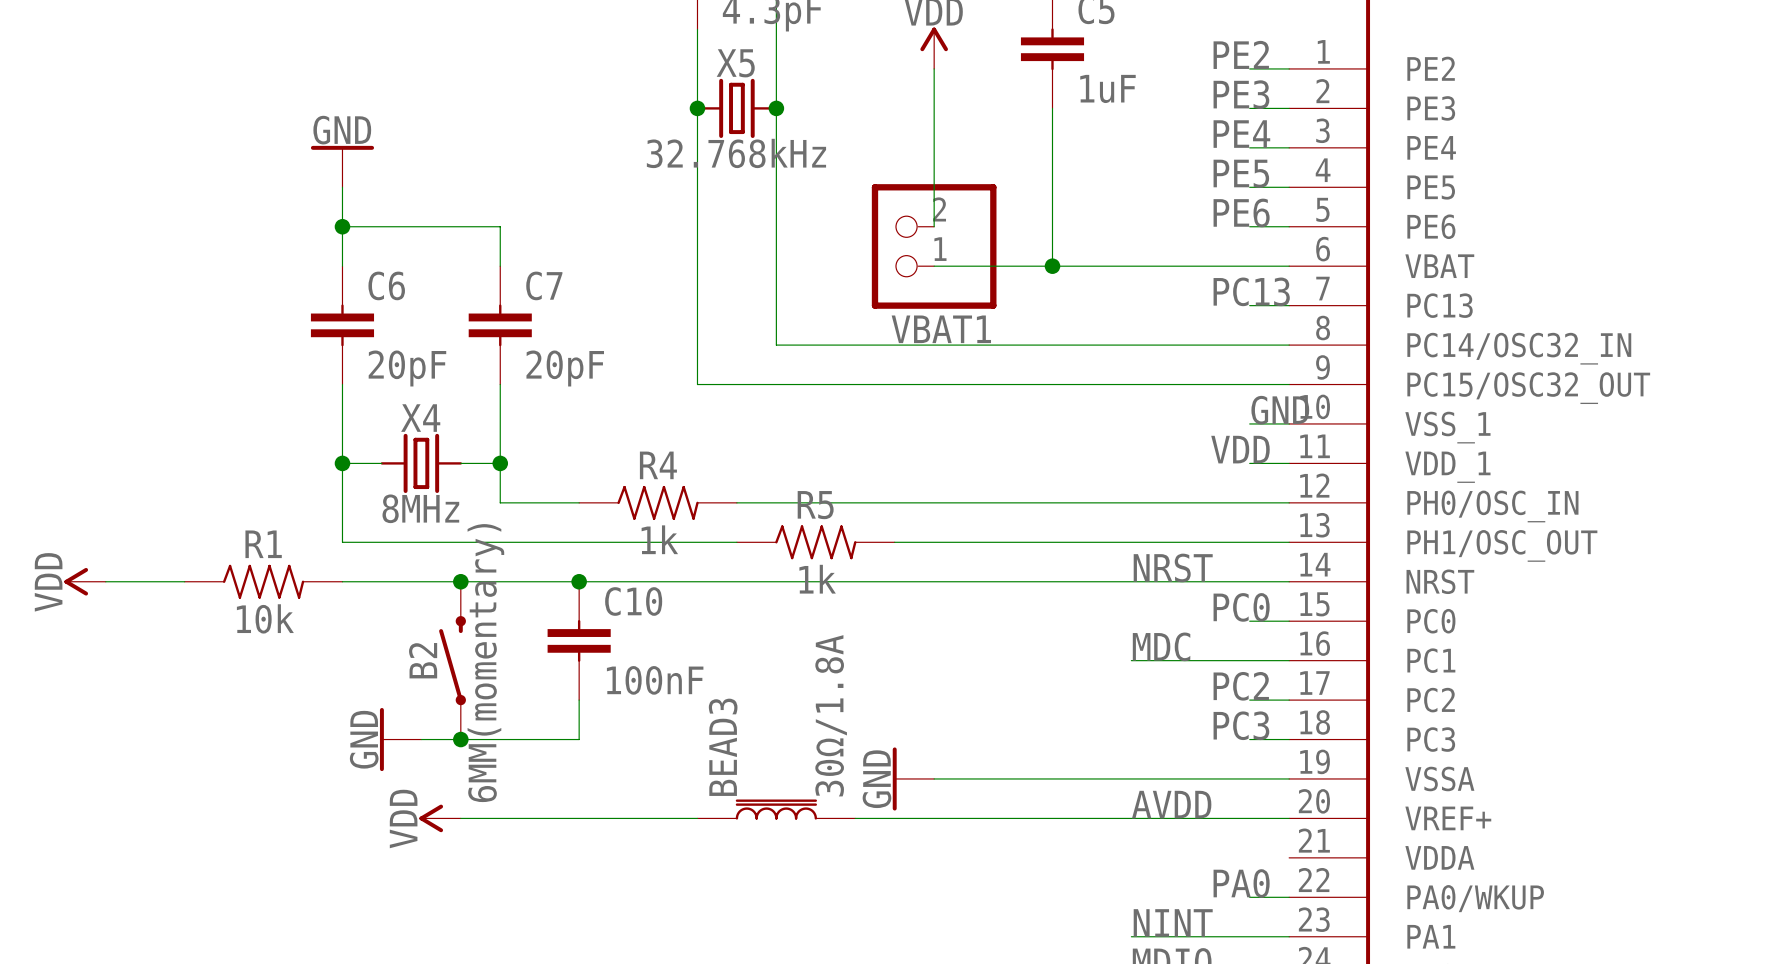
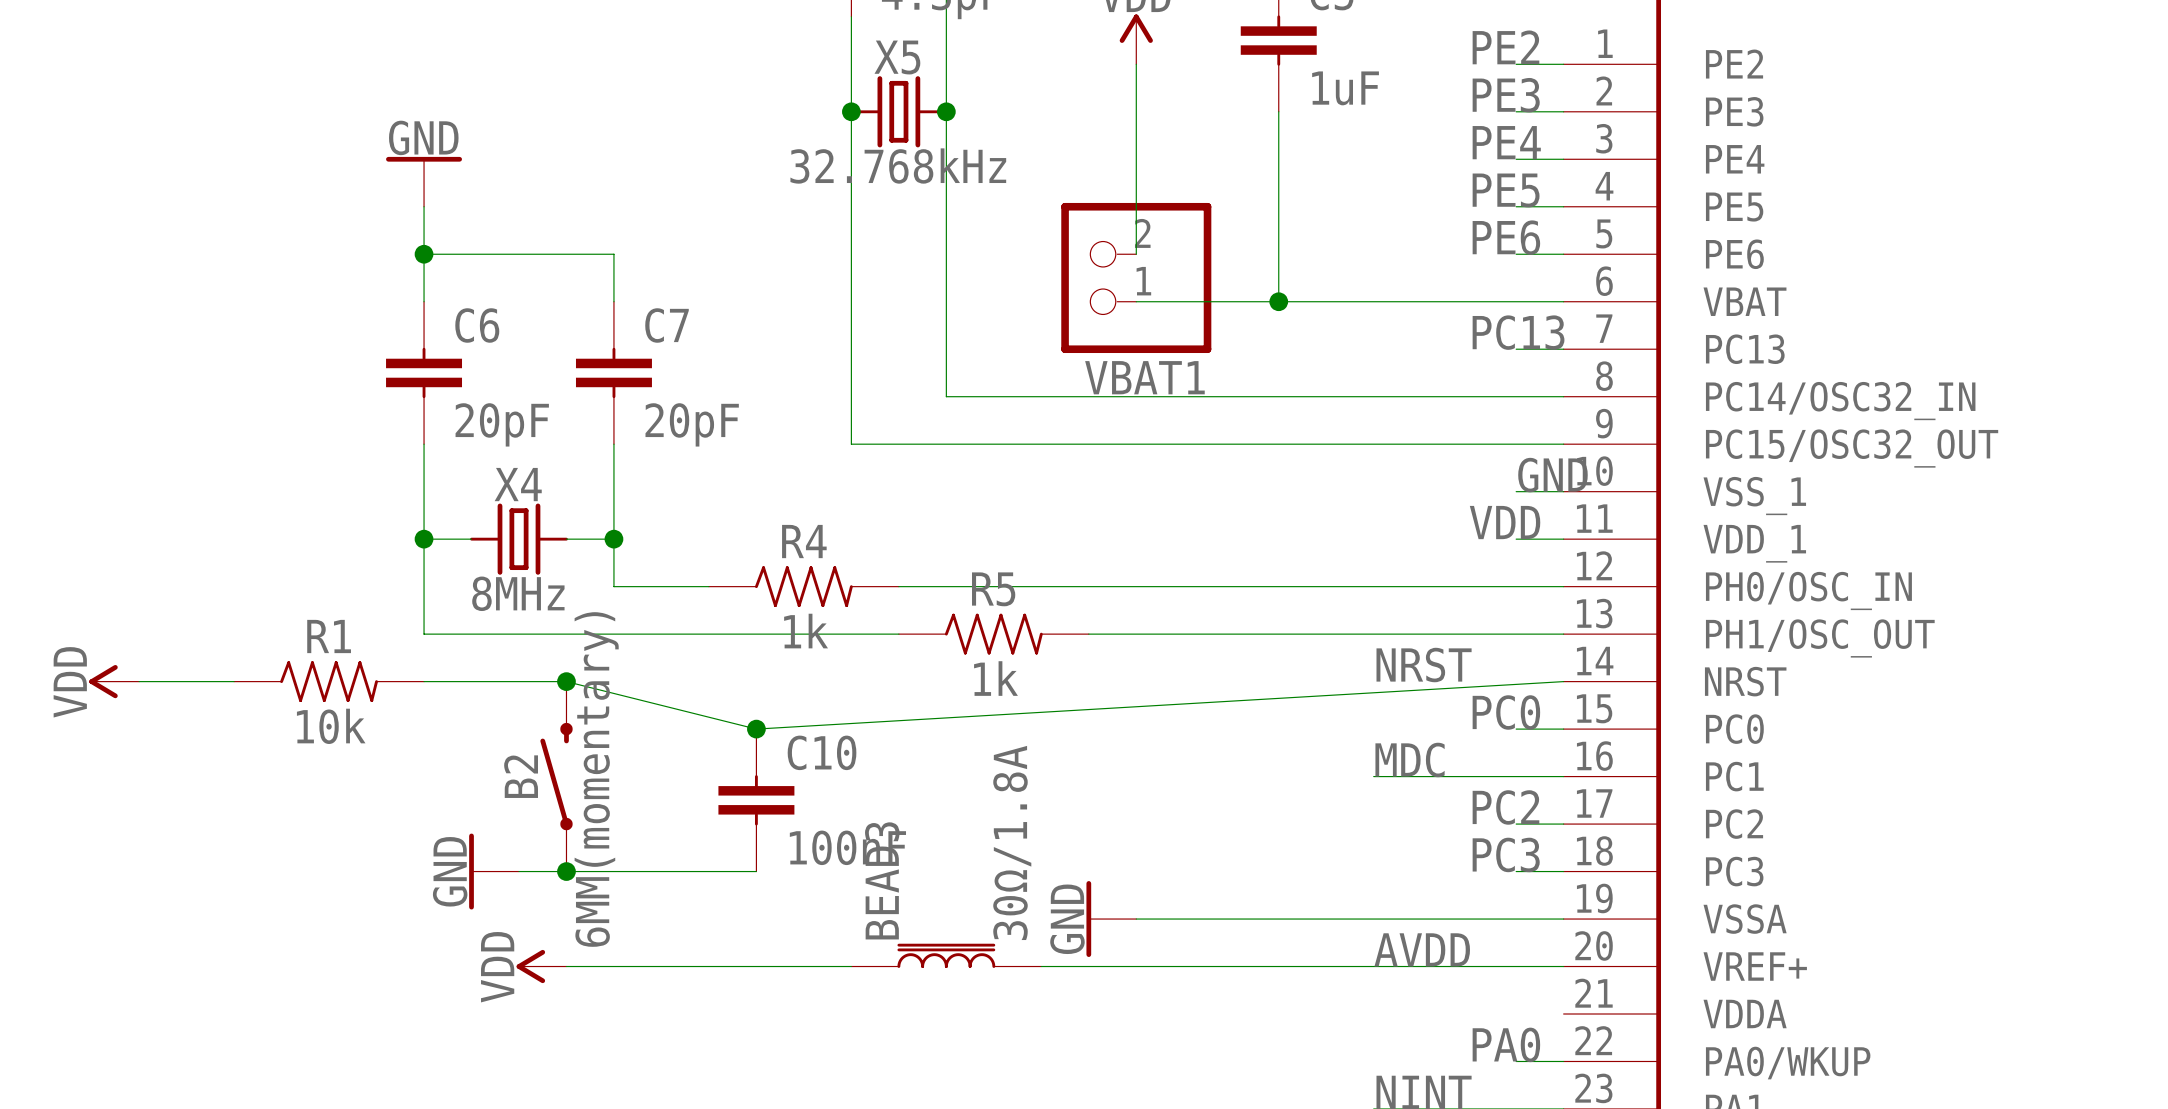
wire: (460, 581) (1289, 581) -> (566, 681) (756, 729) (1563, 681)
junction position: (579, 581) -> (756, 729)
C10 position: (579, 640) -> (756, 800)
wire: (579, 700) (579, 739) -> (756, 871) (708, 871)

